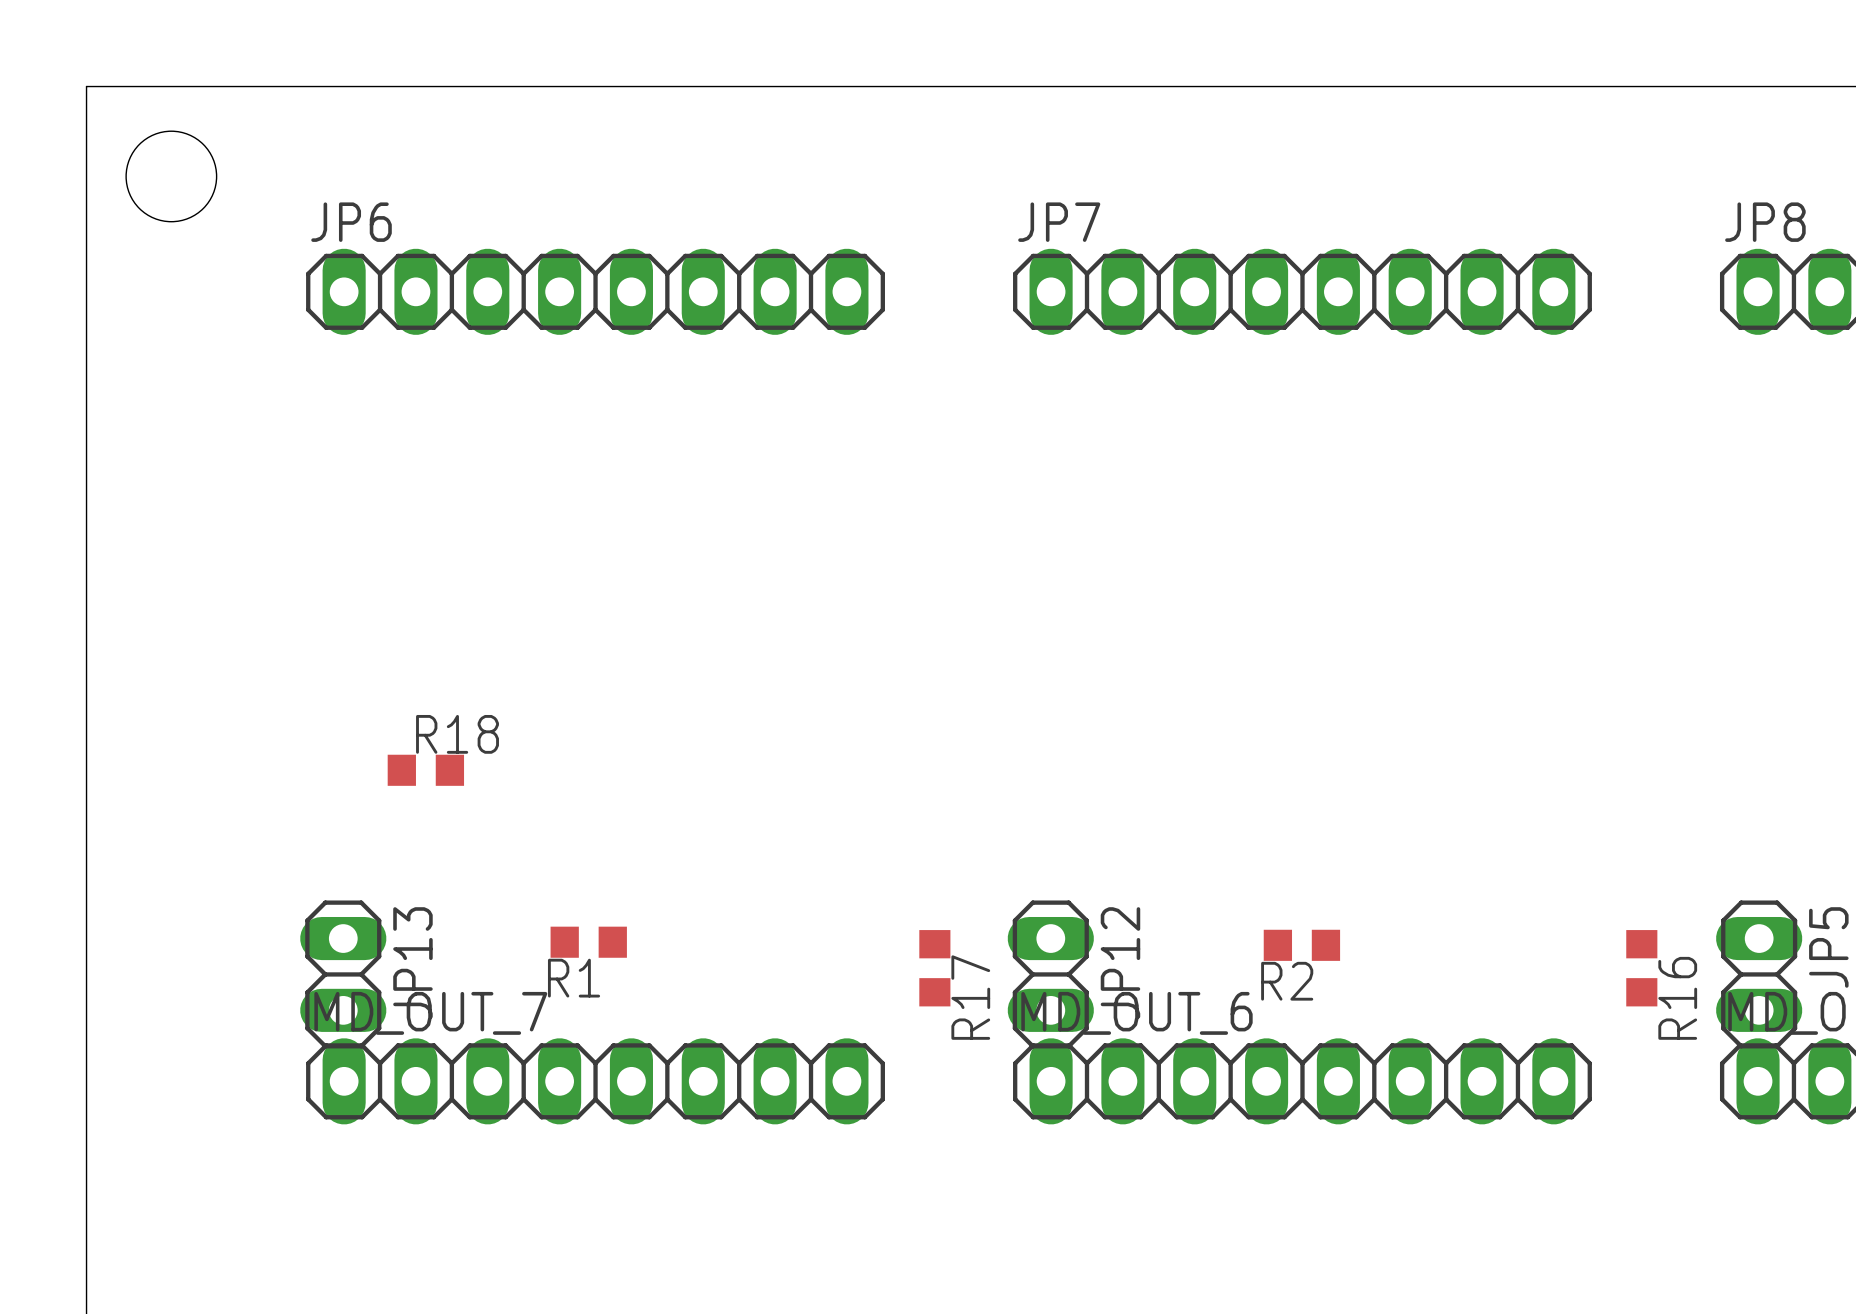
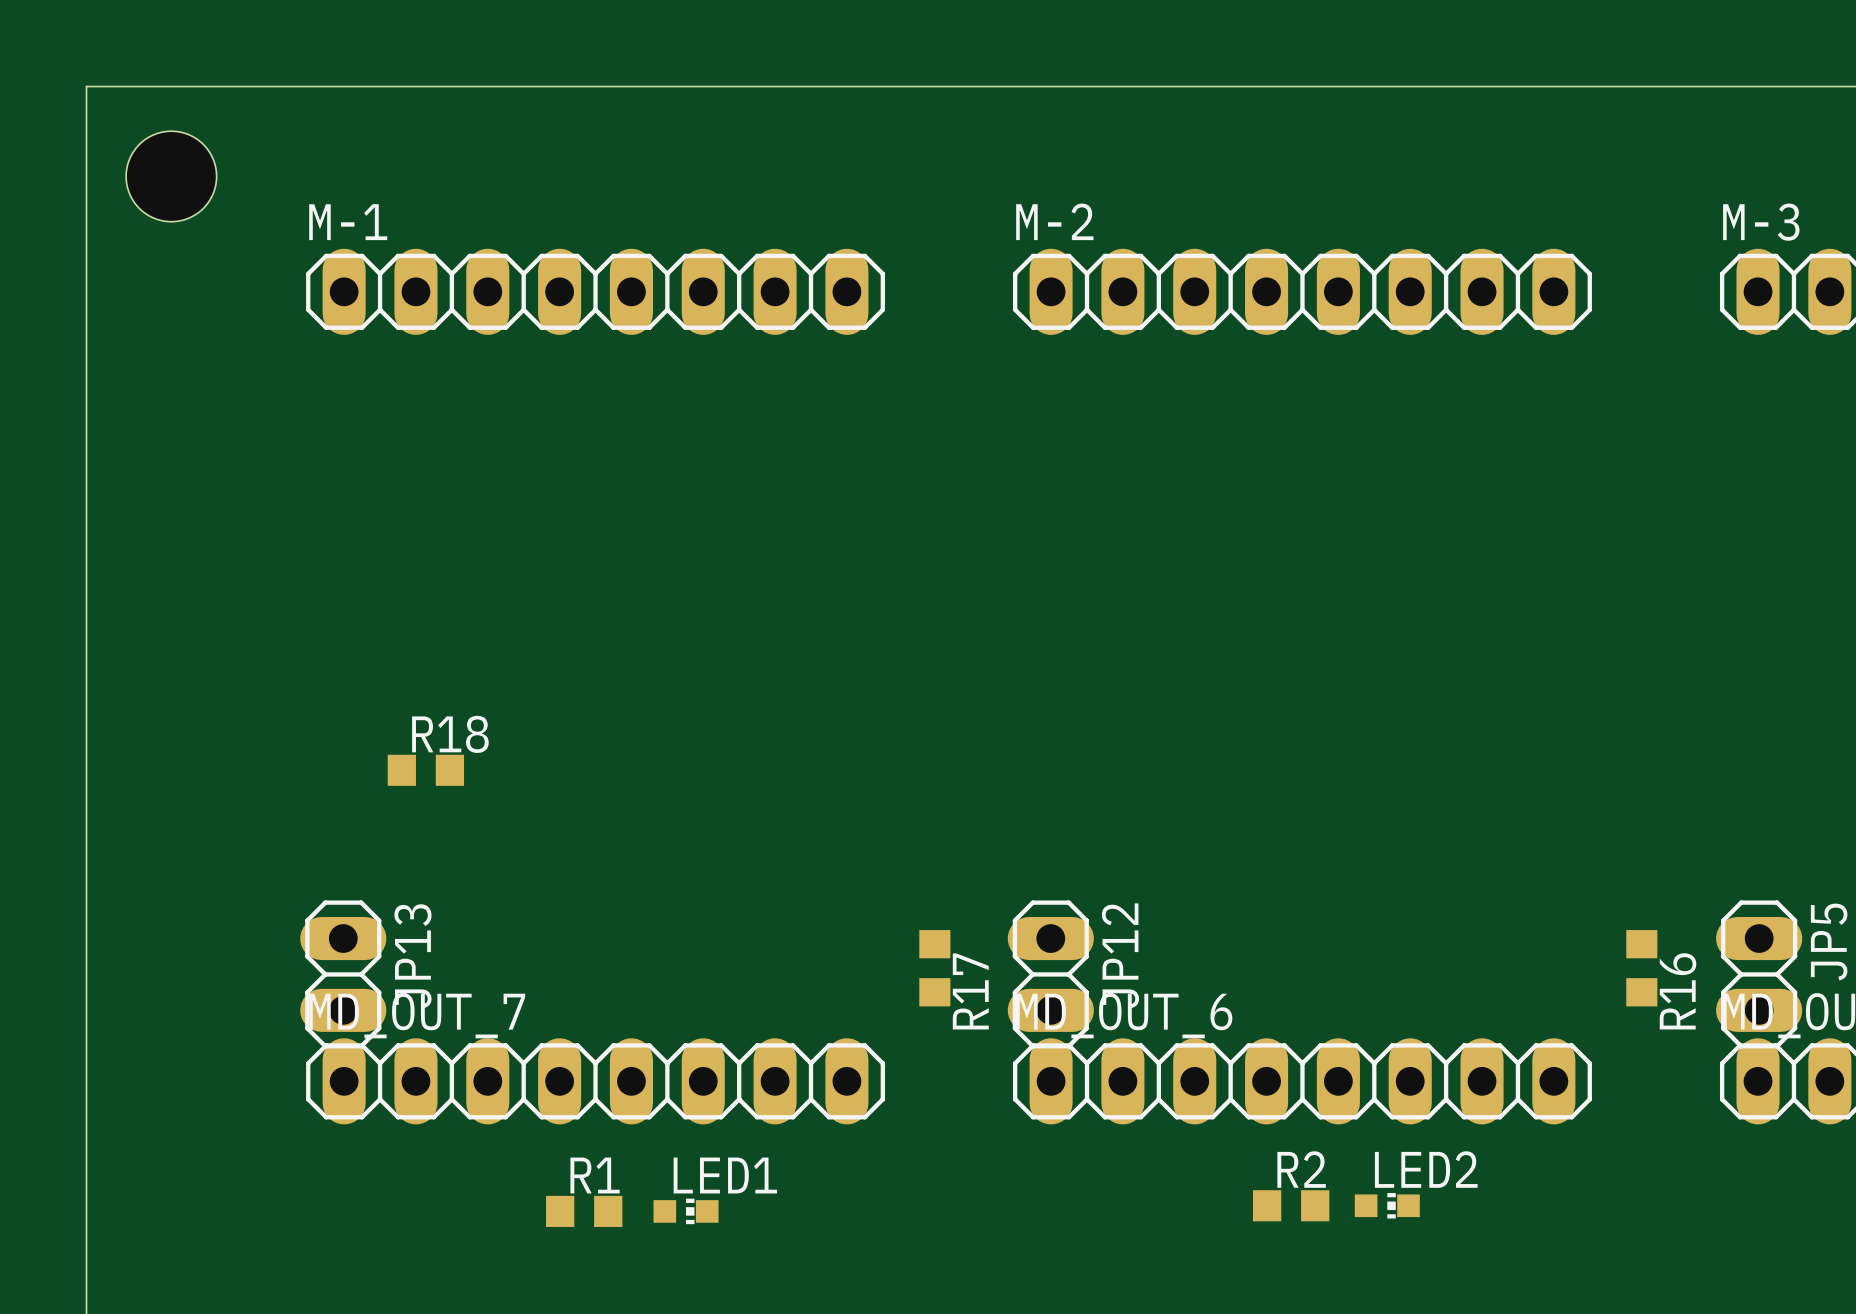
JP6 name: JP6 (351, 222) -> M-1 (348, 222)
JP7 name: JP7 (1059, 222) -> M-2 (1054, 221)
JP8 name: JP8 (1765, 222) -> M-3 (1761, 222)
R1 position: (588, 942) -> (584, 1211)
R2 position: (1301, 945) -> (1291, 1205)
R1 name position: R1 (574, 978) -> R1 (595, 1175)
R2 name position: R2 (1287, 981) -> R2 (1301, 1169)
LED2: none -> (1387, 1205)
LED1: none -> (686, 1211)

